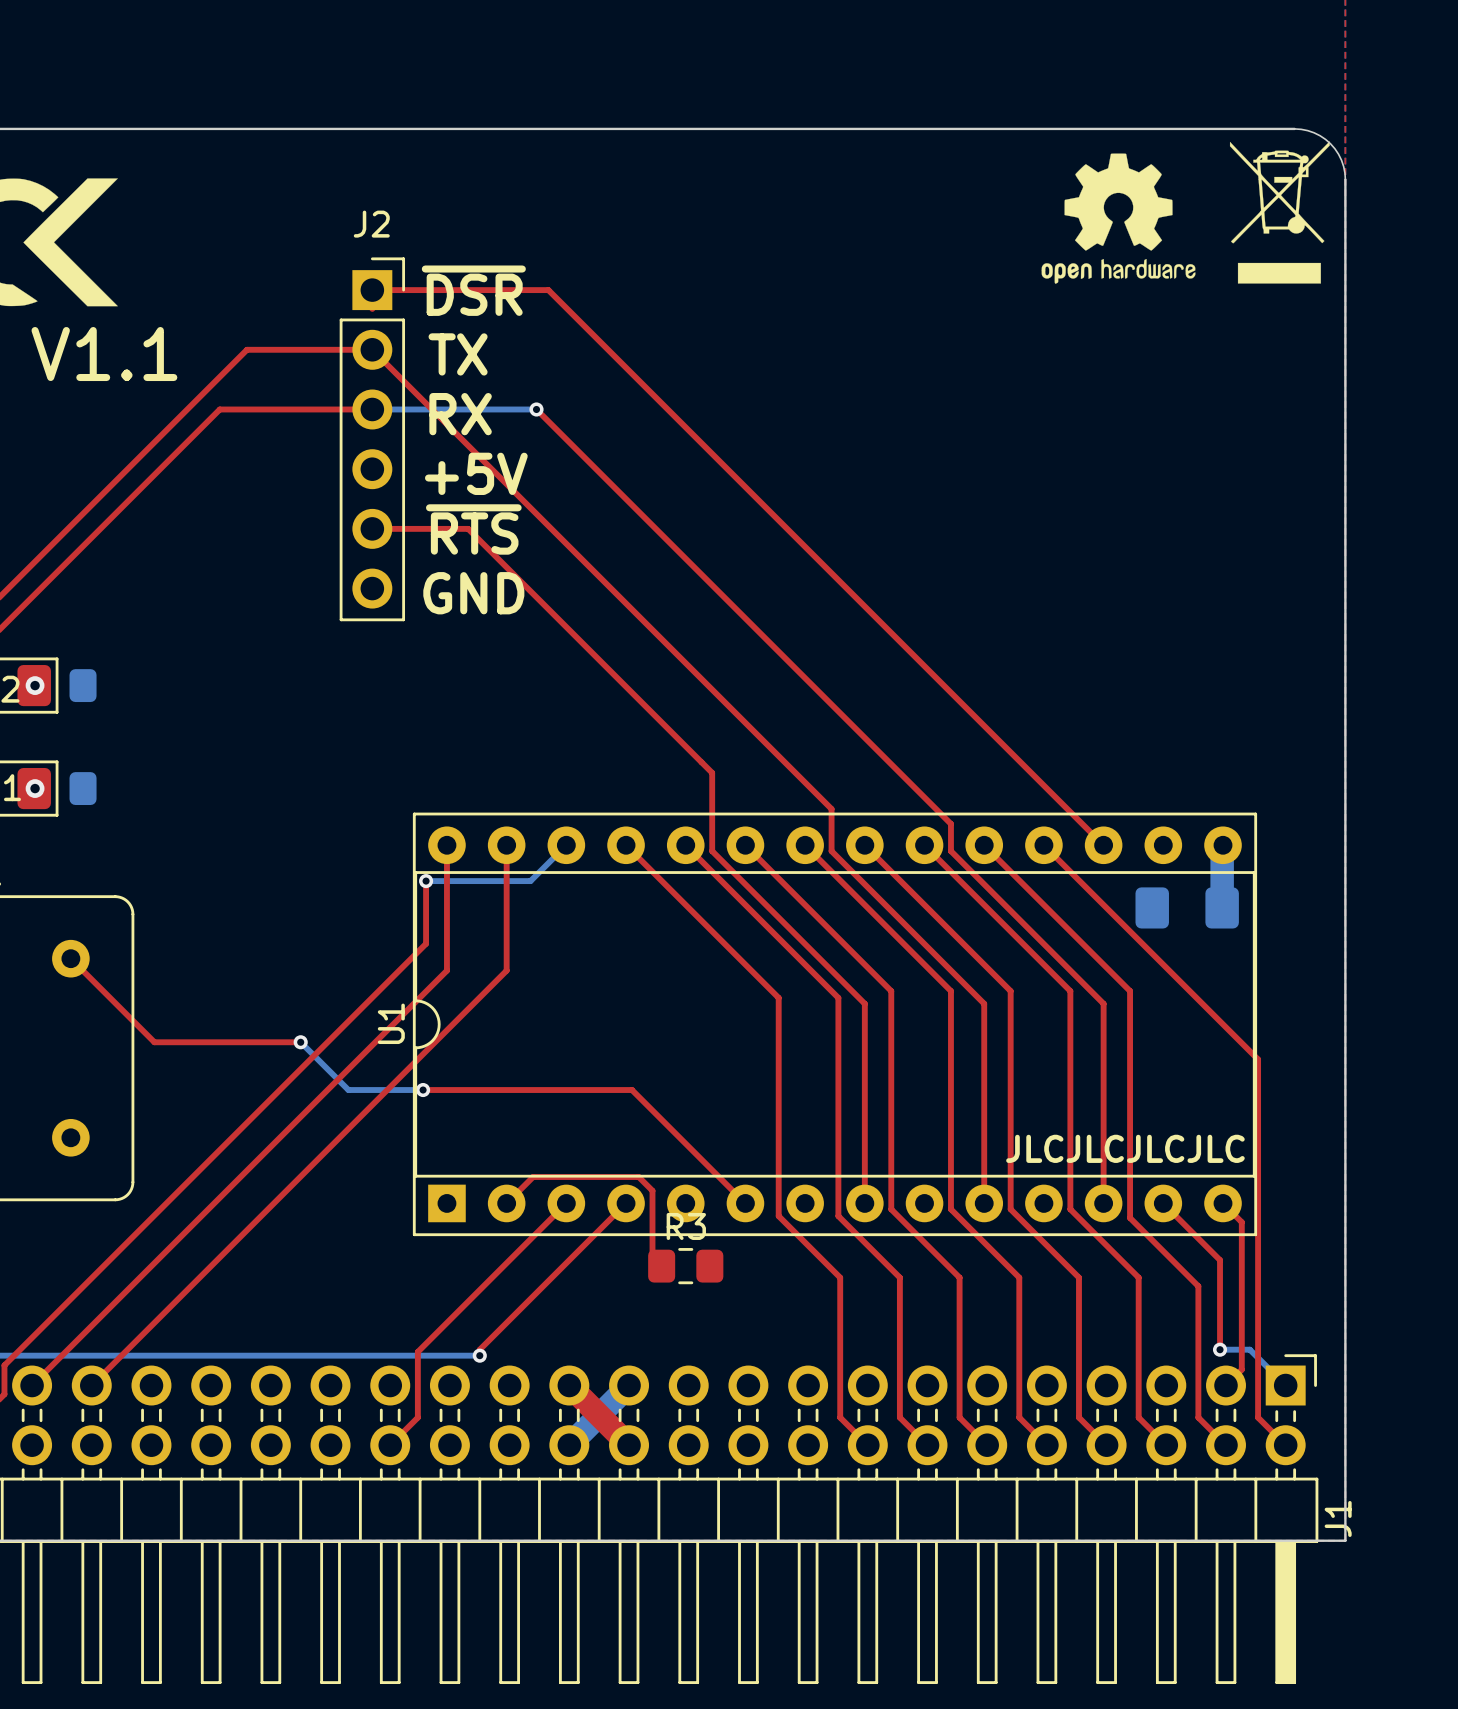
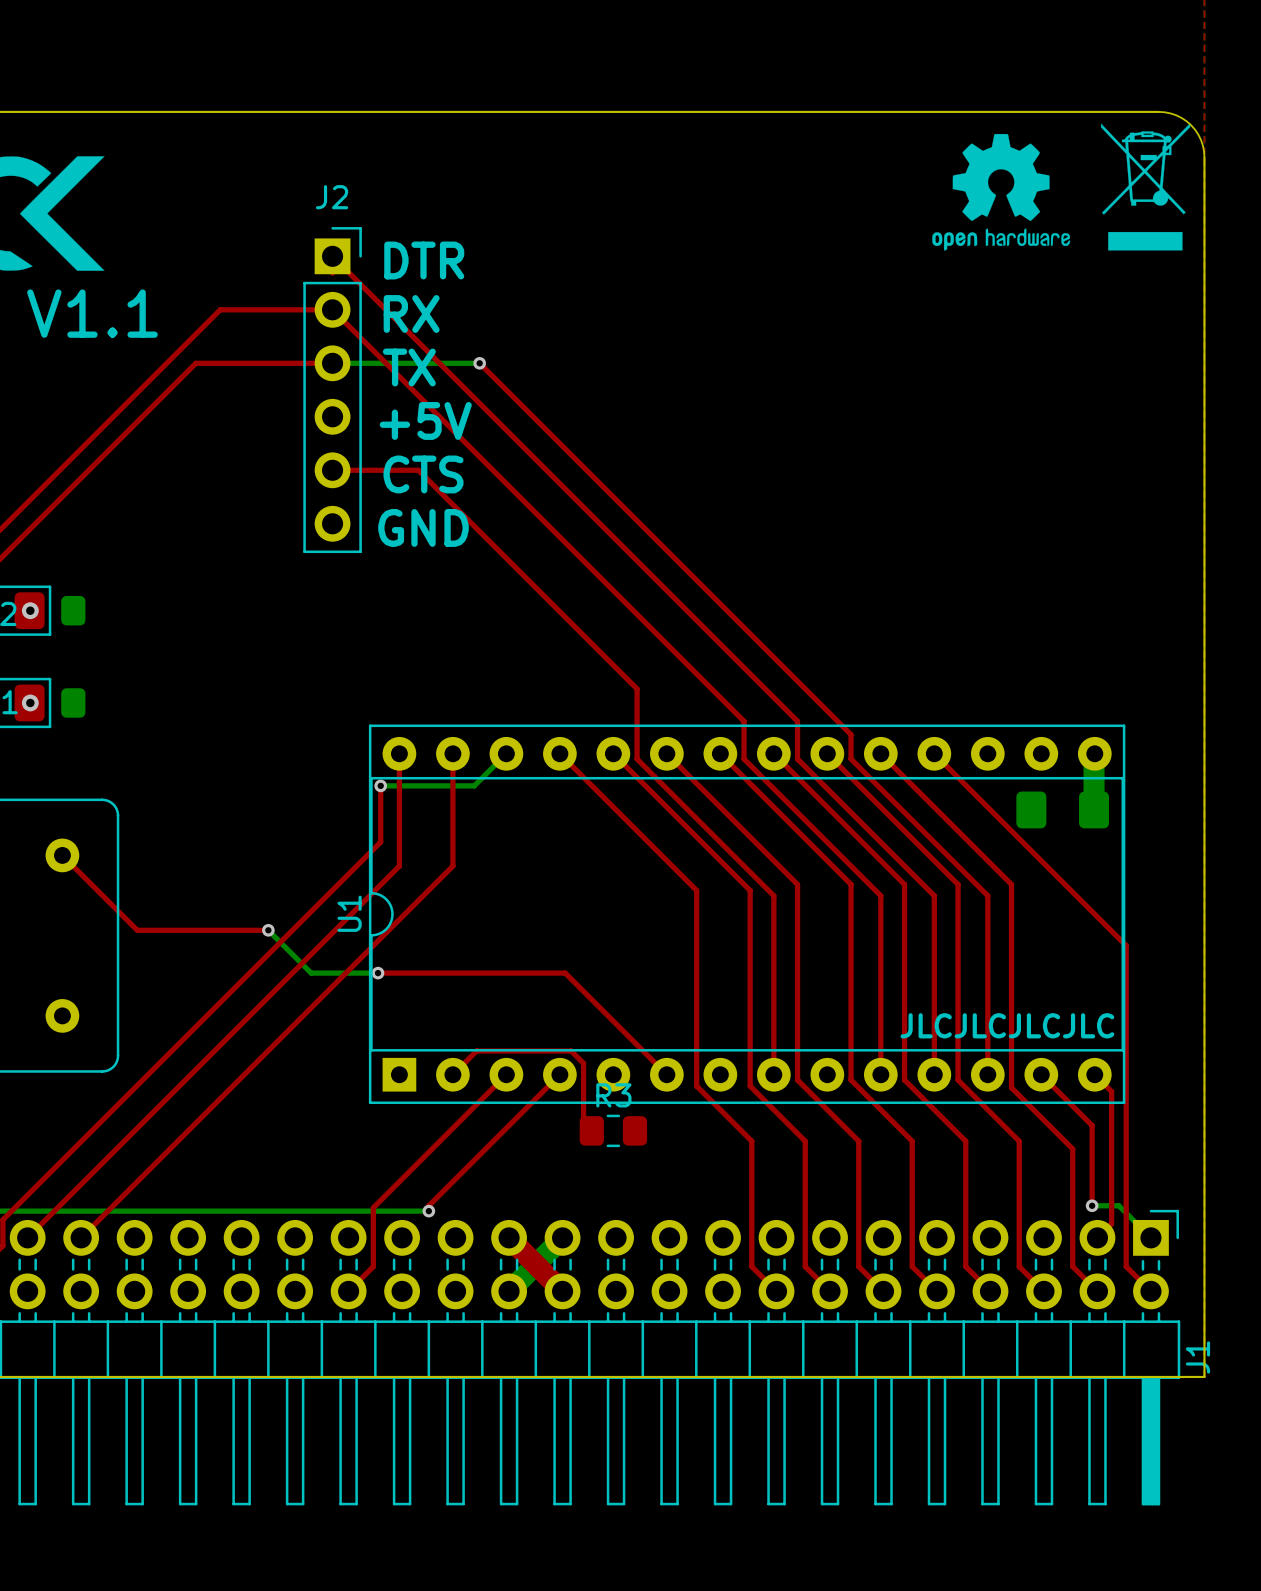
top track: (372, 290) (548, 290) (1103, 845) -> (332, 256) (797, 721) (797, 759) (934, 895) (934, 1074)
text: ~{DSR} (473, 290) -> DTR (424, 260)
text: TX (458, 354) -> RX (411, 313)
text: RX (460, 414) -> TX (409, 367)
text: ~{RTS} (473, 529) -> CTS (423, 474)

